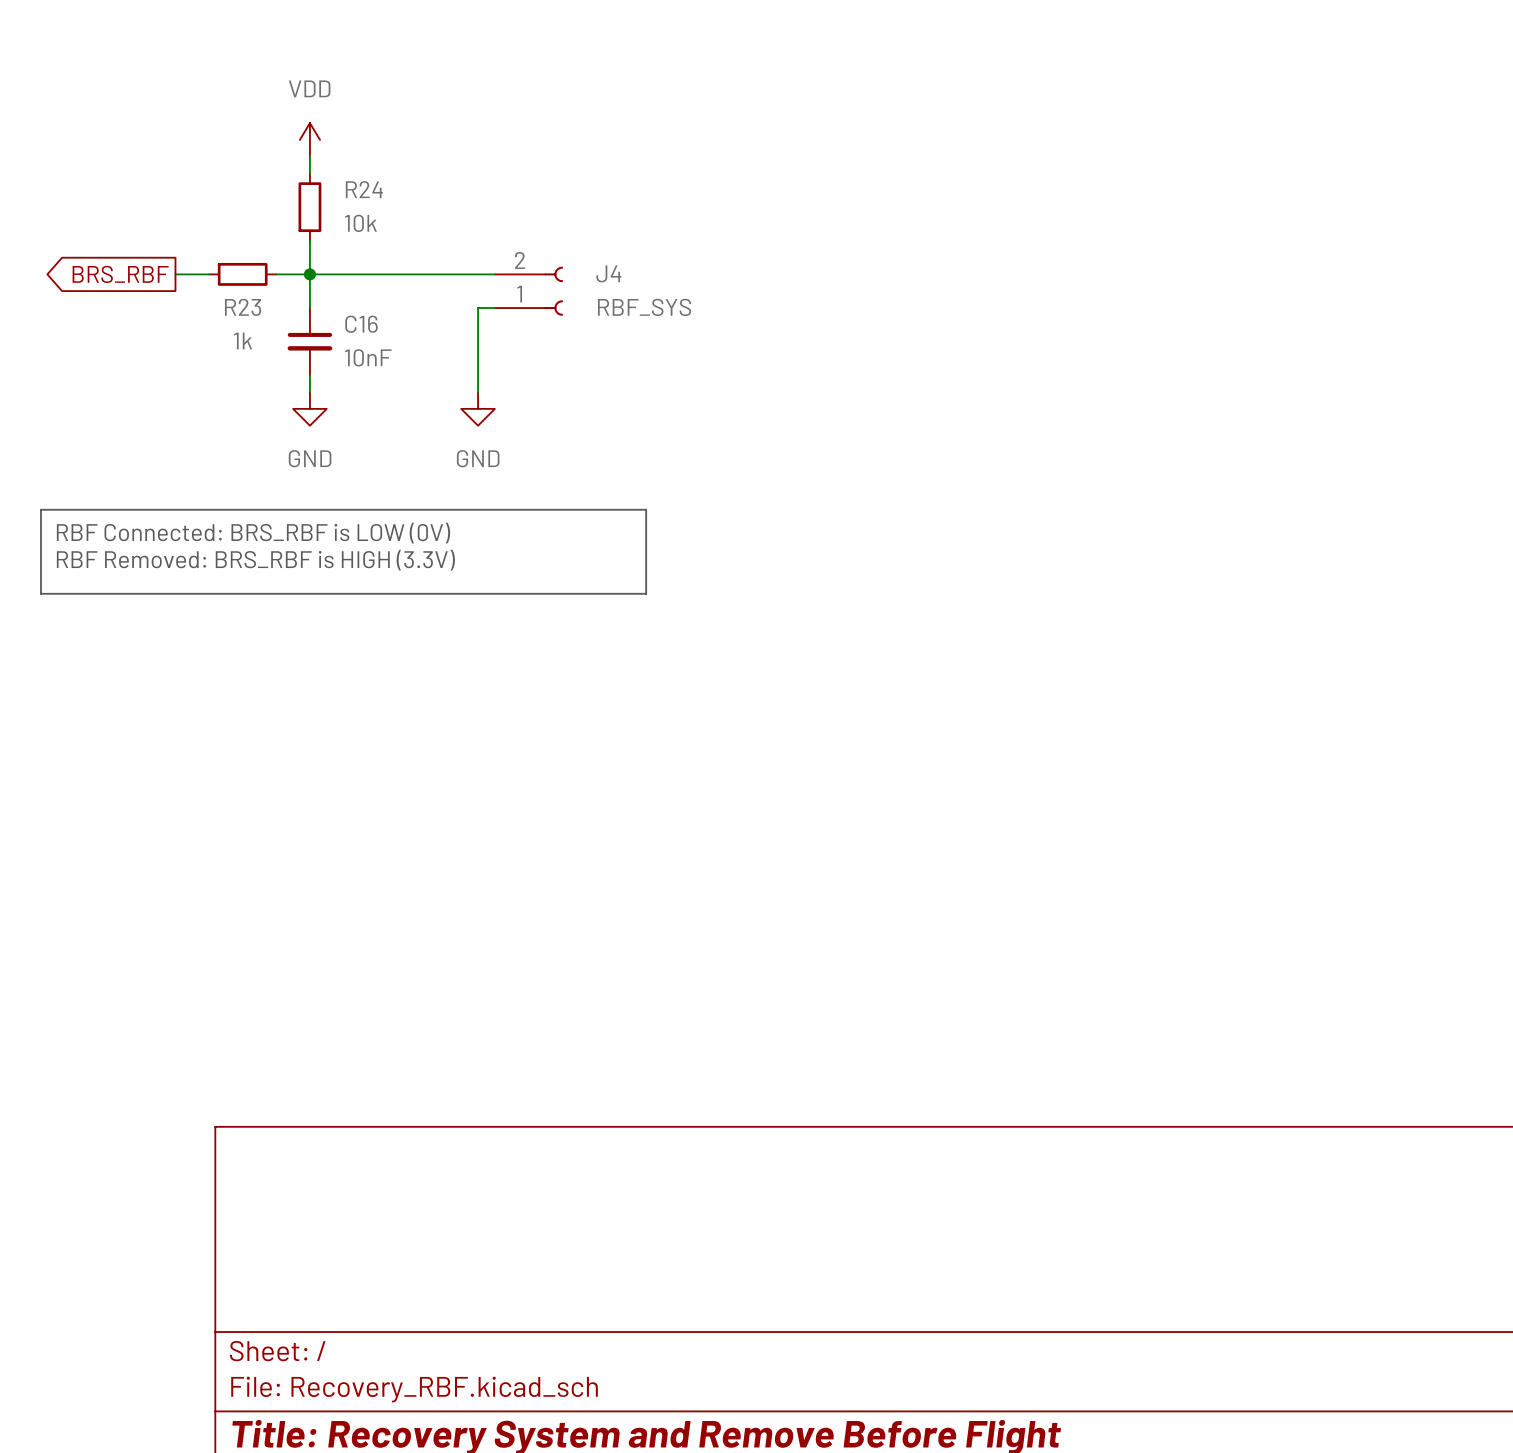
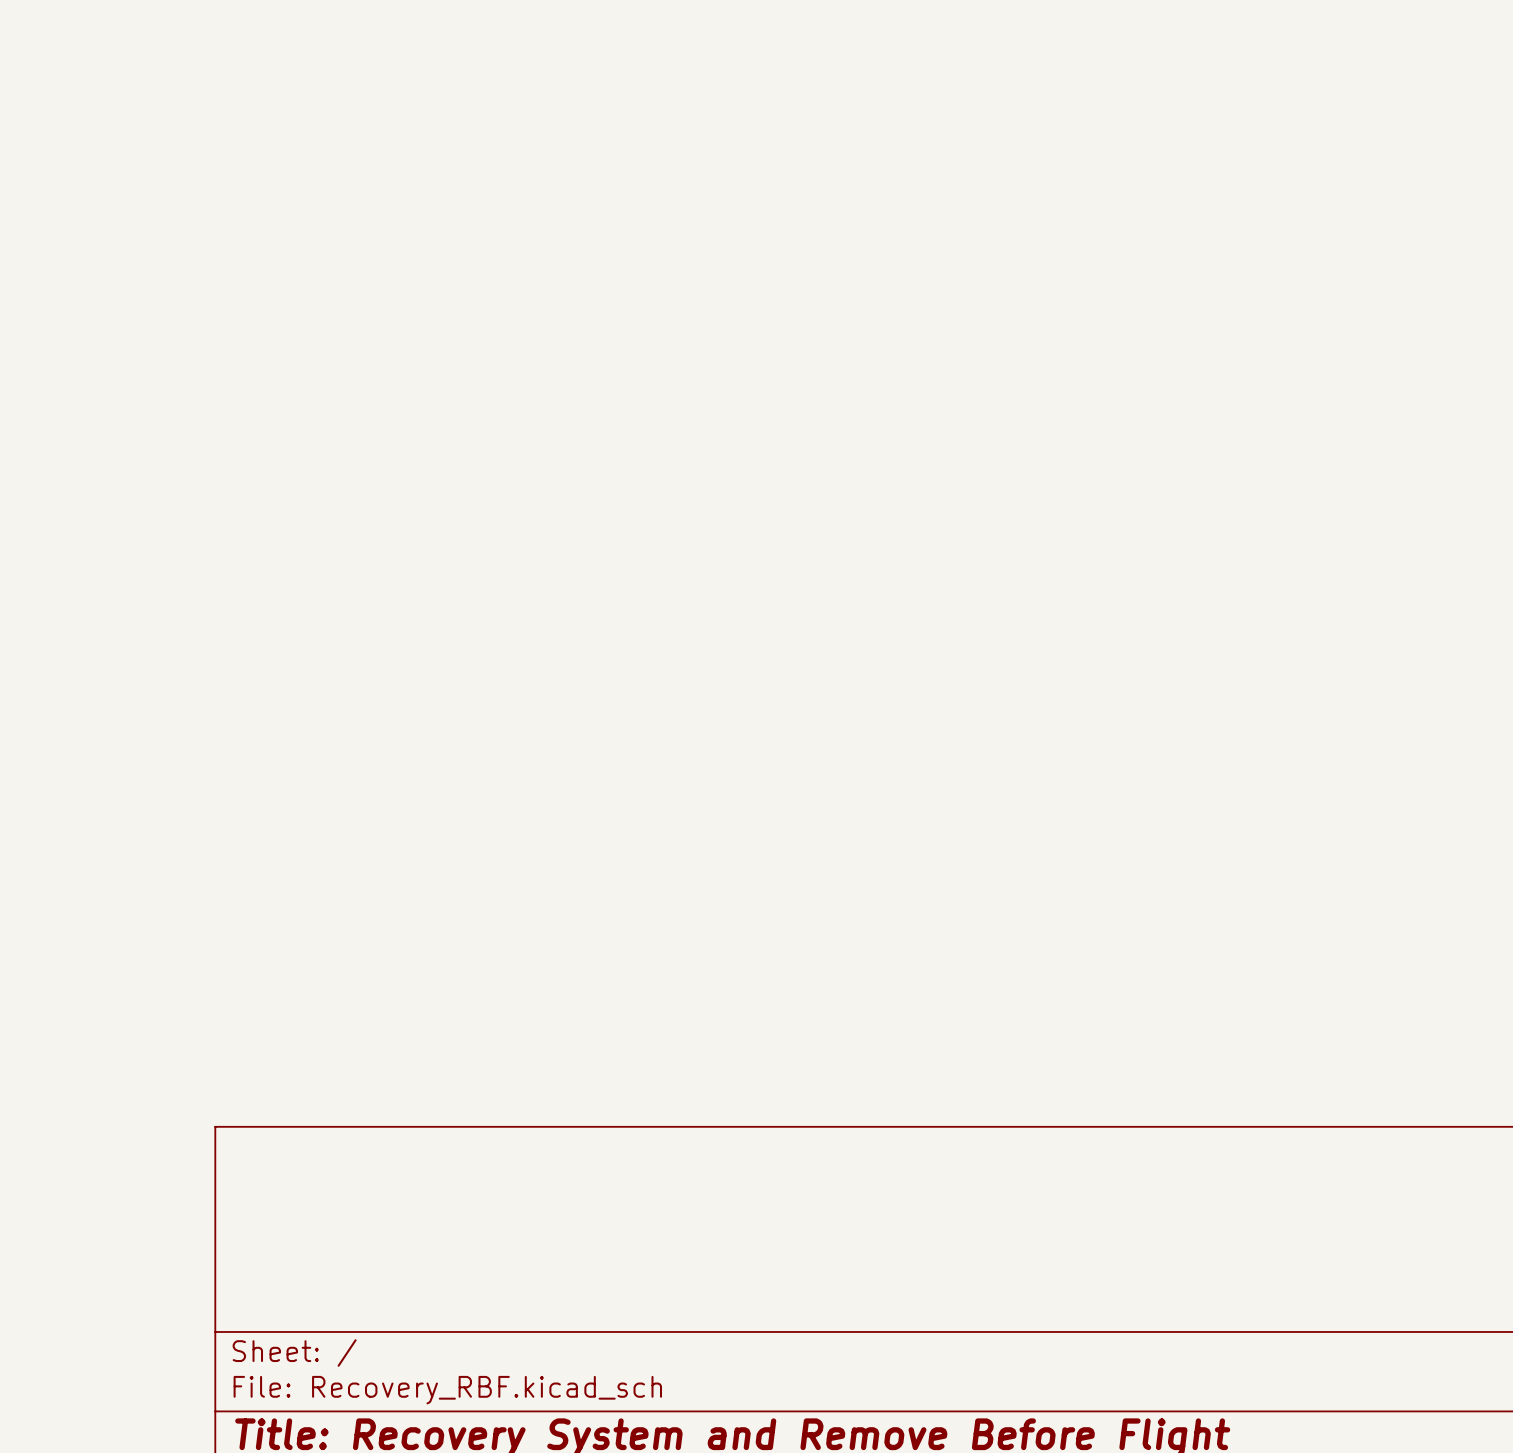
power symbol: VDD (309, 139) -> none
wire: (309, 156) (309, 173) -> none
R24: 10k (309, 207) -> none
wire: (309, 240) (309, 308) -> none
global label: BRS_RBF (120, 274) -> none
wire: (175, 274) (209, 274) -> none
R23: 1k (242, 274) -> none
wire: (276, 274) (494, 274) -> none
junction: (309, 274) -> none
J4: RBF_SYS (528, 291) -> none
wire: (494, 308) (478, 308) (478, 392) -> none
C16: 10nF (309, 341) -> none
wire: (309, 375) (309, 392) -> none
power symbol: GND (309, 408) -> none
power symbol: GND (478, 408) -> none
line: (40, 509) (646, 509) (646, 593) (40, 593) (40, 509) -> none
text: RBF Connected: BRS_RBF is LOW (0V) (253, 533) -> none
text: RBF Removed: BRS_RBF is HIGH (3.3V) (255, 560) -> none

